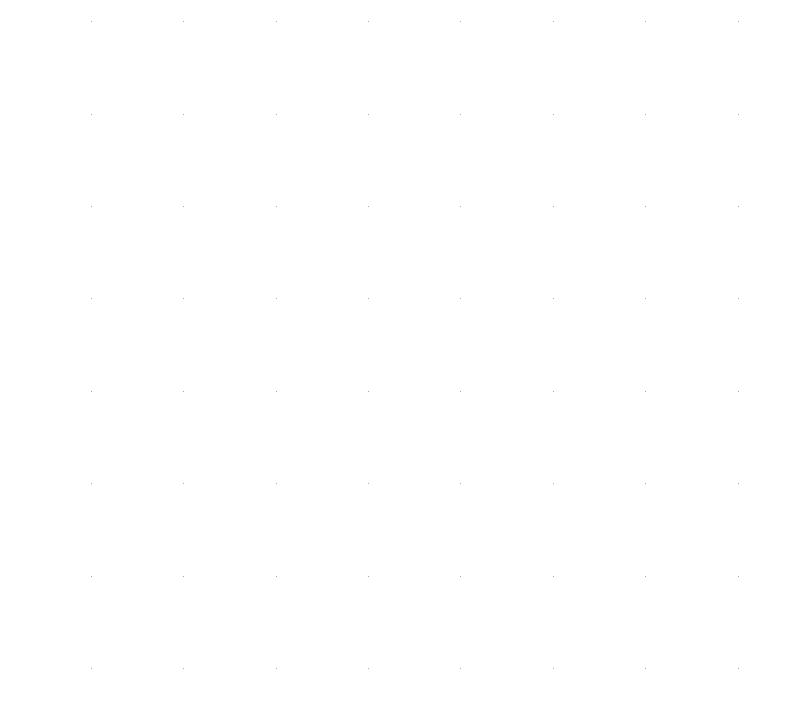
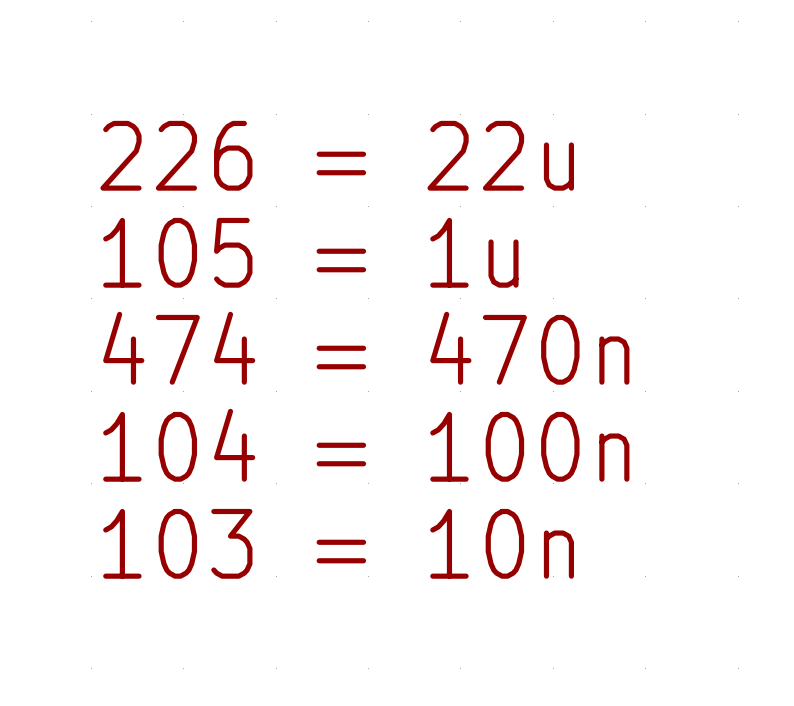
text: none -> 226 = 22u (337, 155)
text: none -> 105 = 1u (310, 252)
text: none -> 474 = 470n (366, 348)
text: none -> 104 = 100n (366, 445)
text: none -> 103 = 10n (338, 543)

